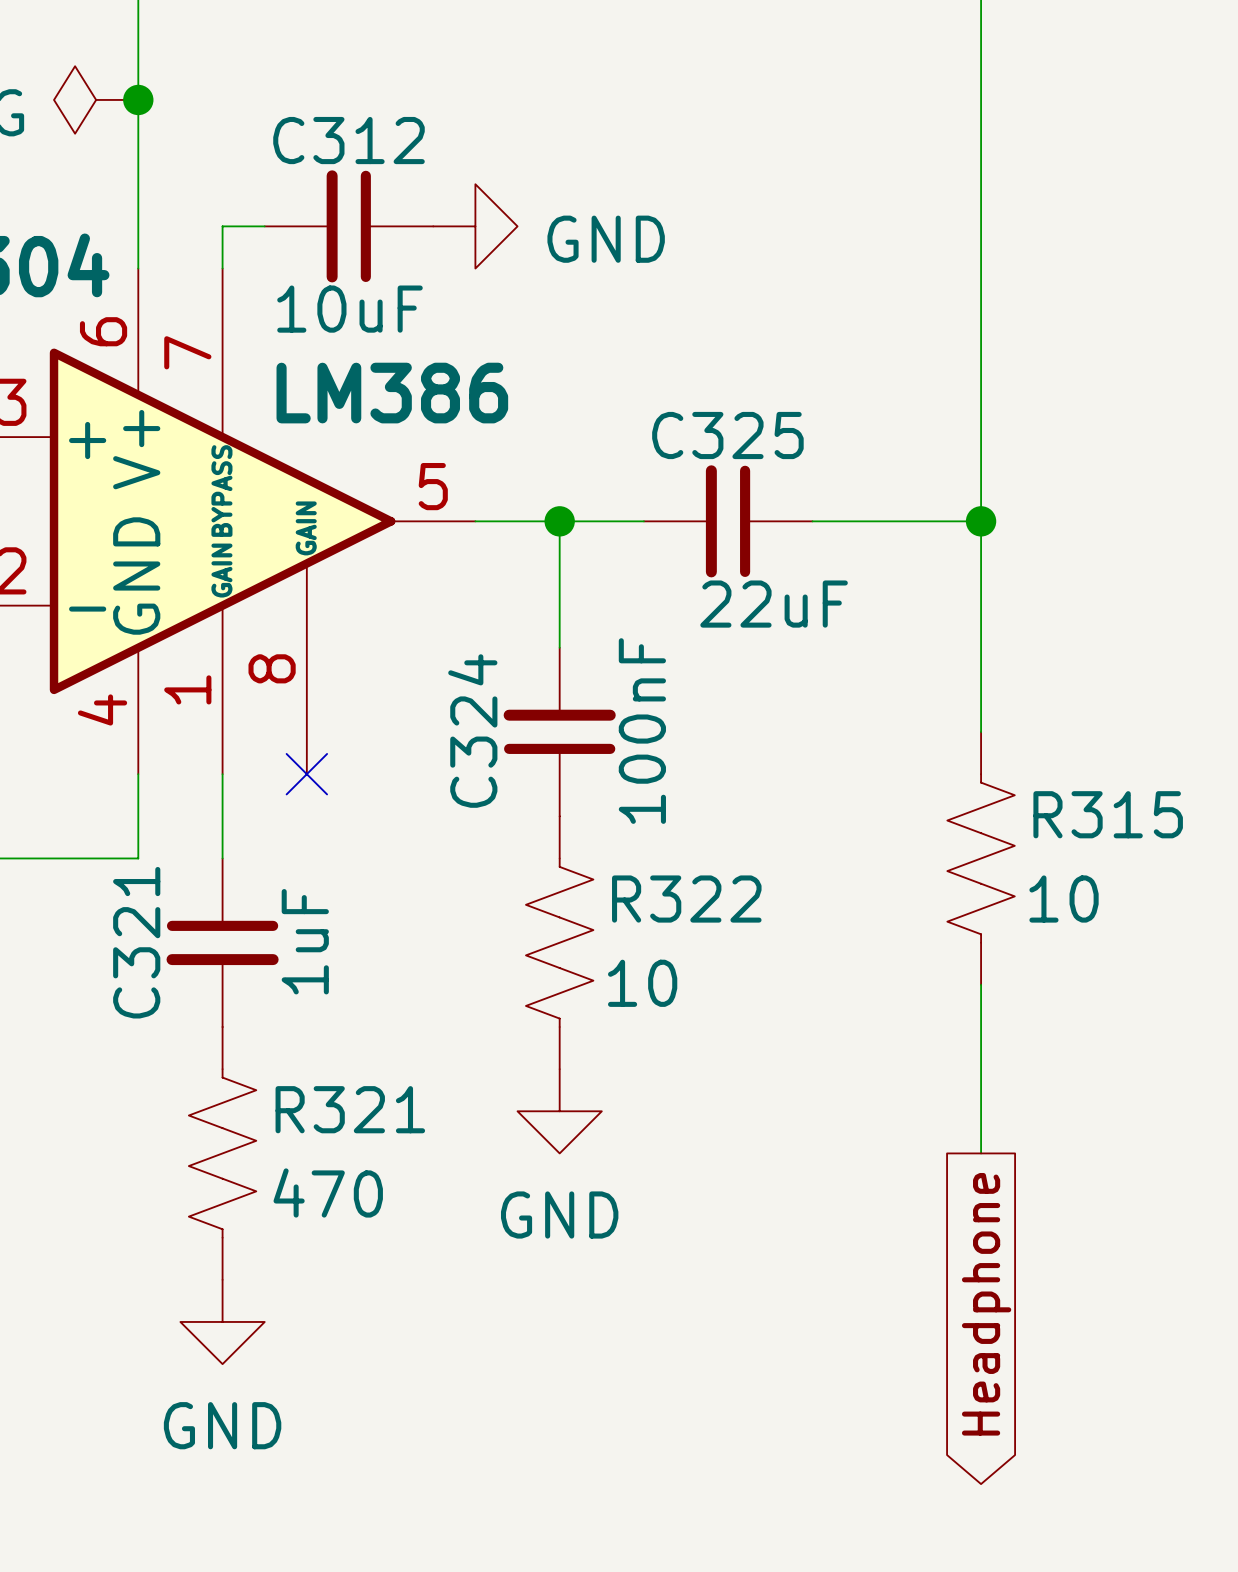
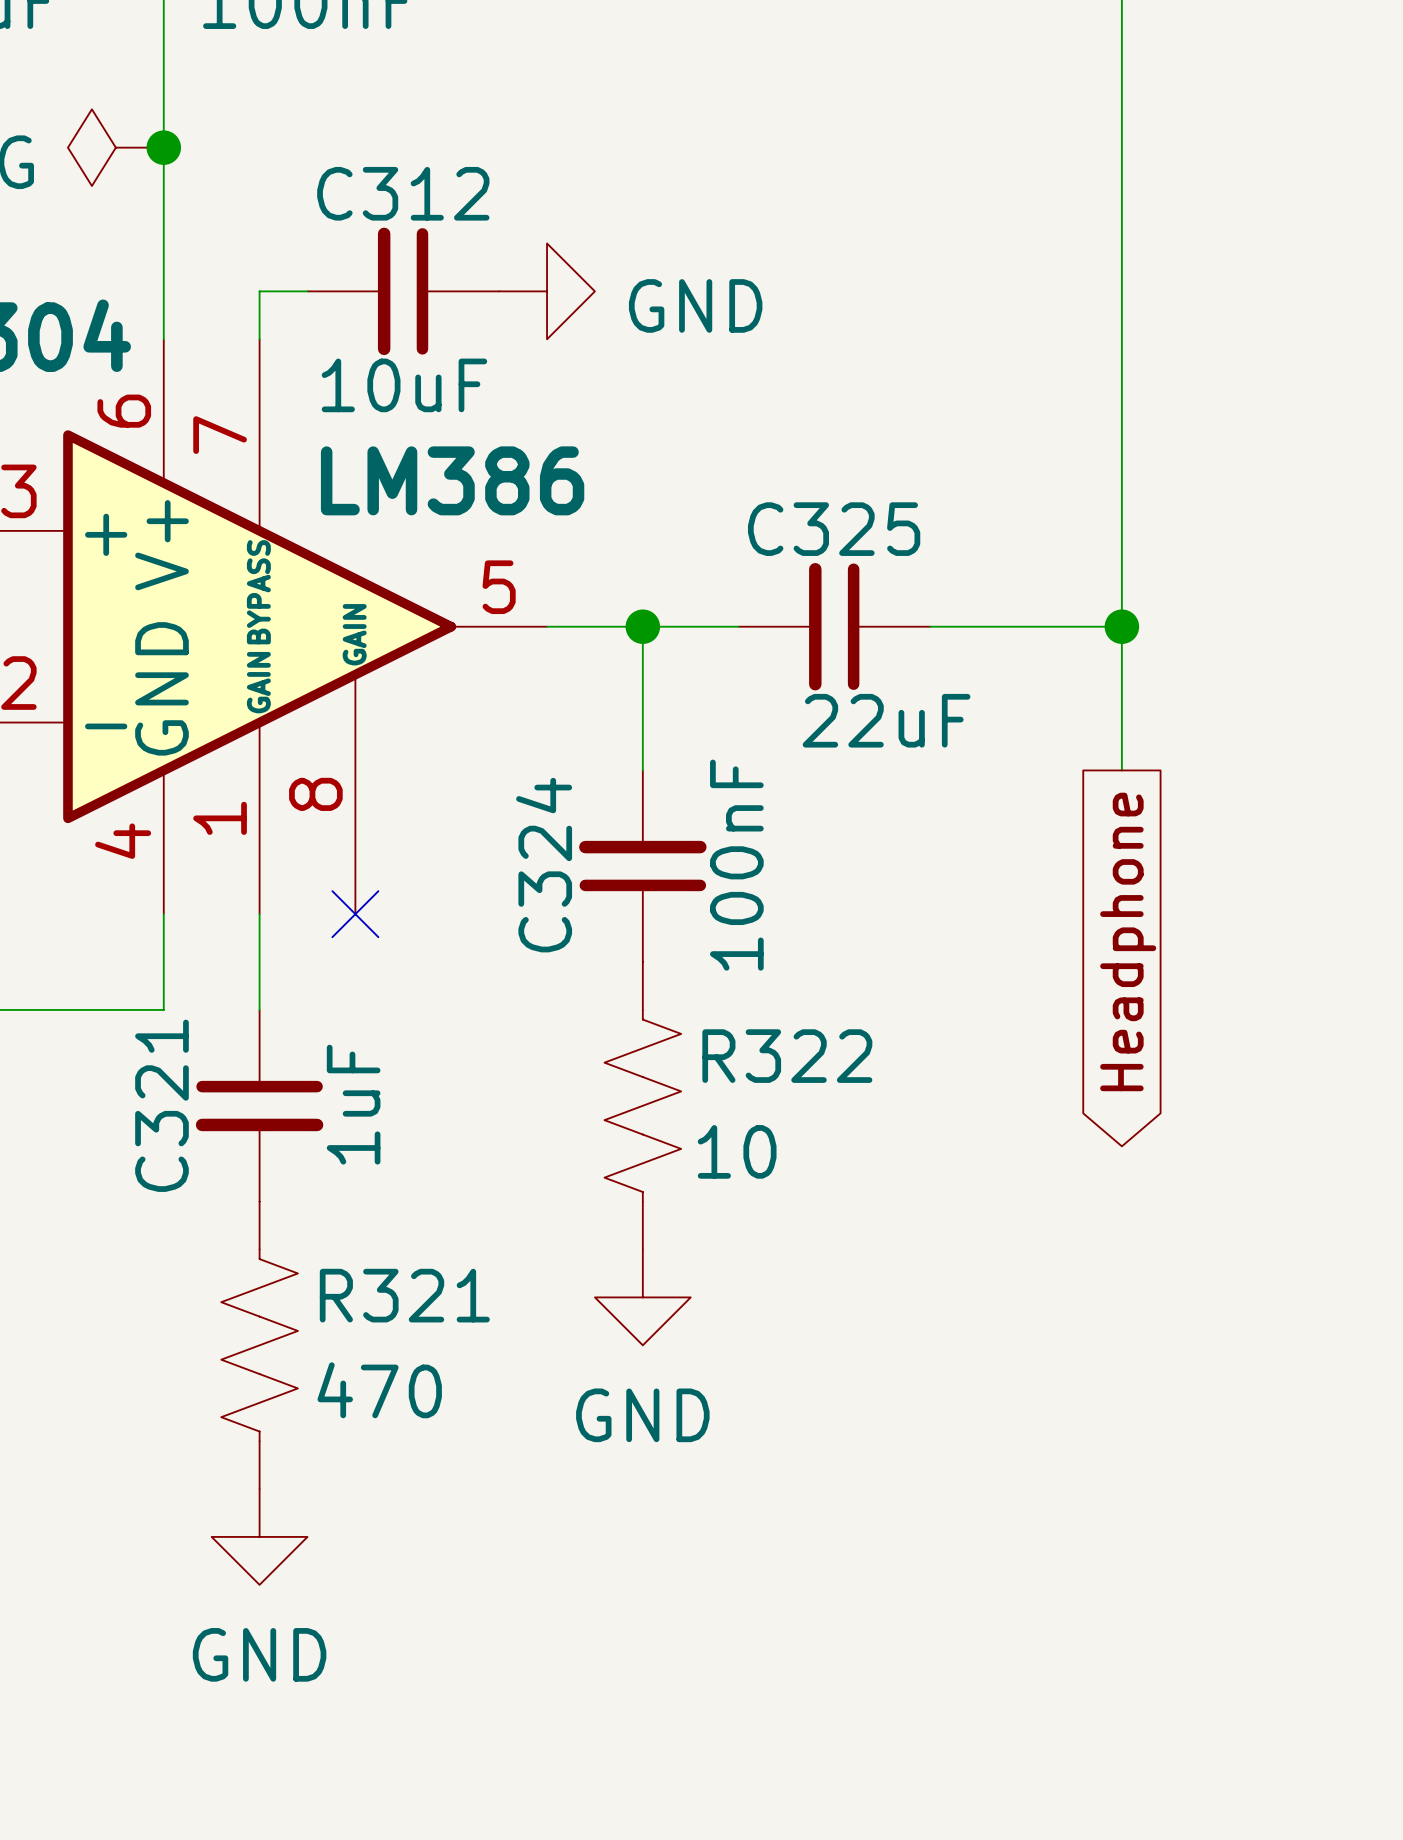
wire: (981, 647) (981, 732) -> none
R315: 10 (981, 858) -> none
wire: (981, 984) (981, 1153) -> none
global label position: Headphone (986, 1304) -> Headphone (1128, 941)

